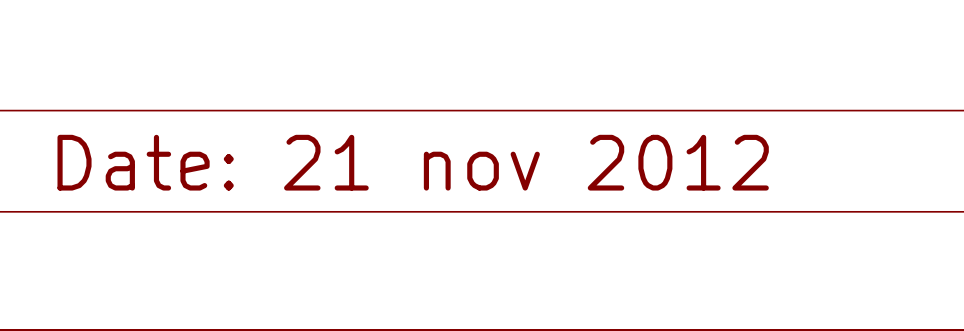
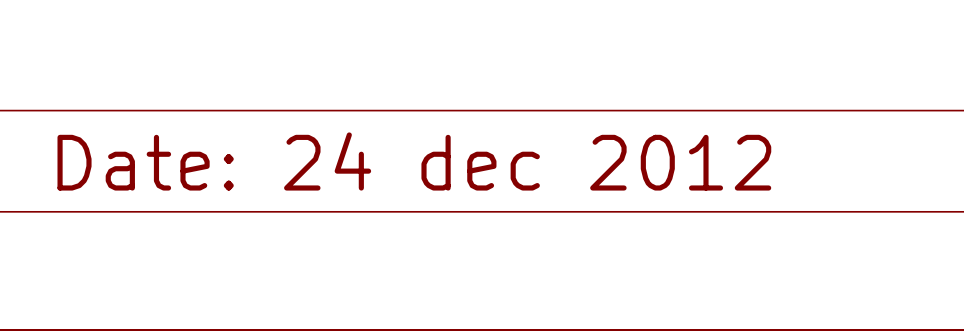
title block: Date: 21 nov 2012 (413, 162) -> Date: 24 dec 2012 (414, 161)

